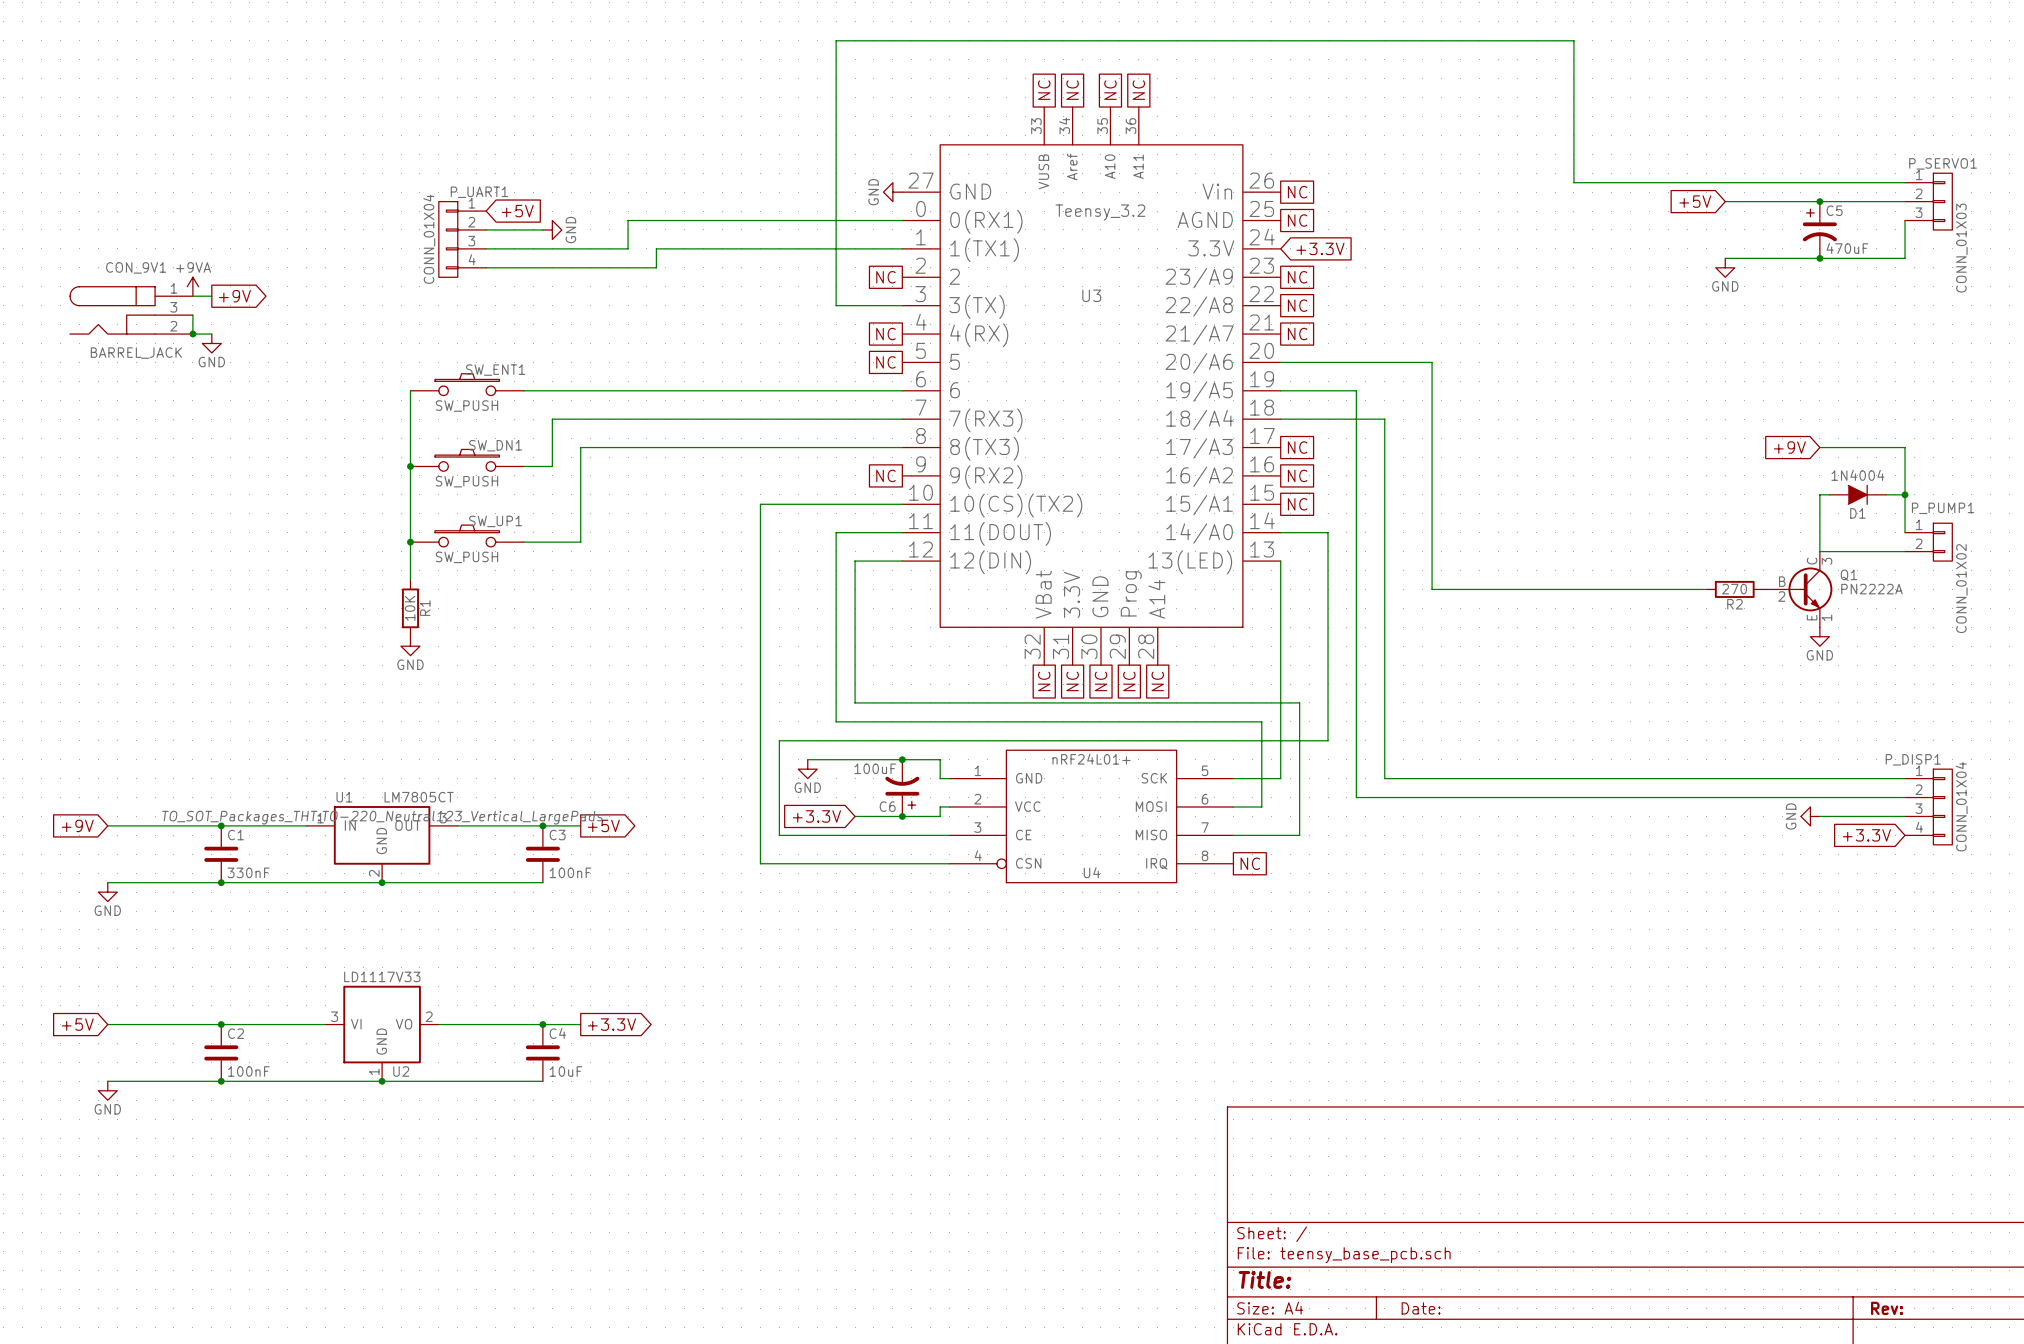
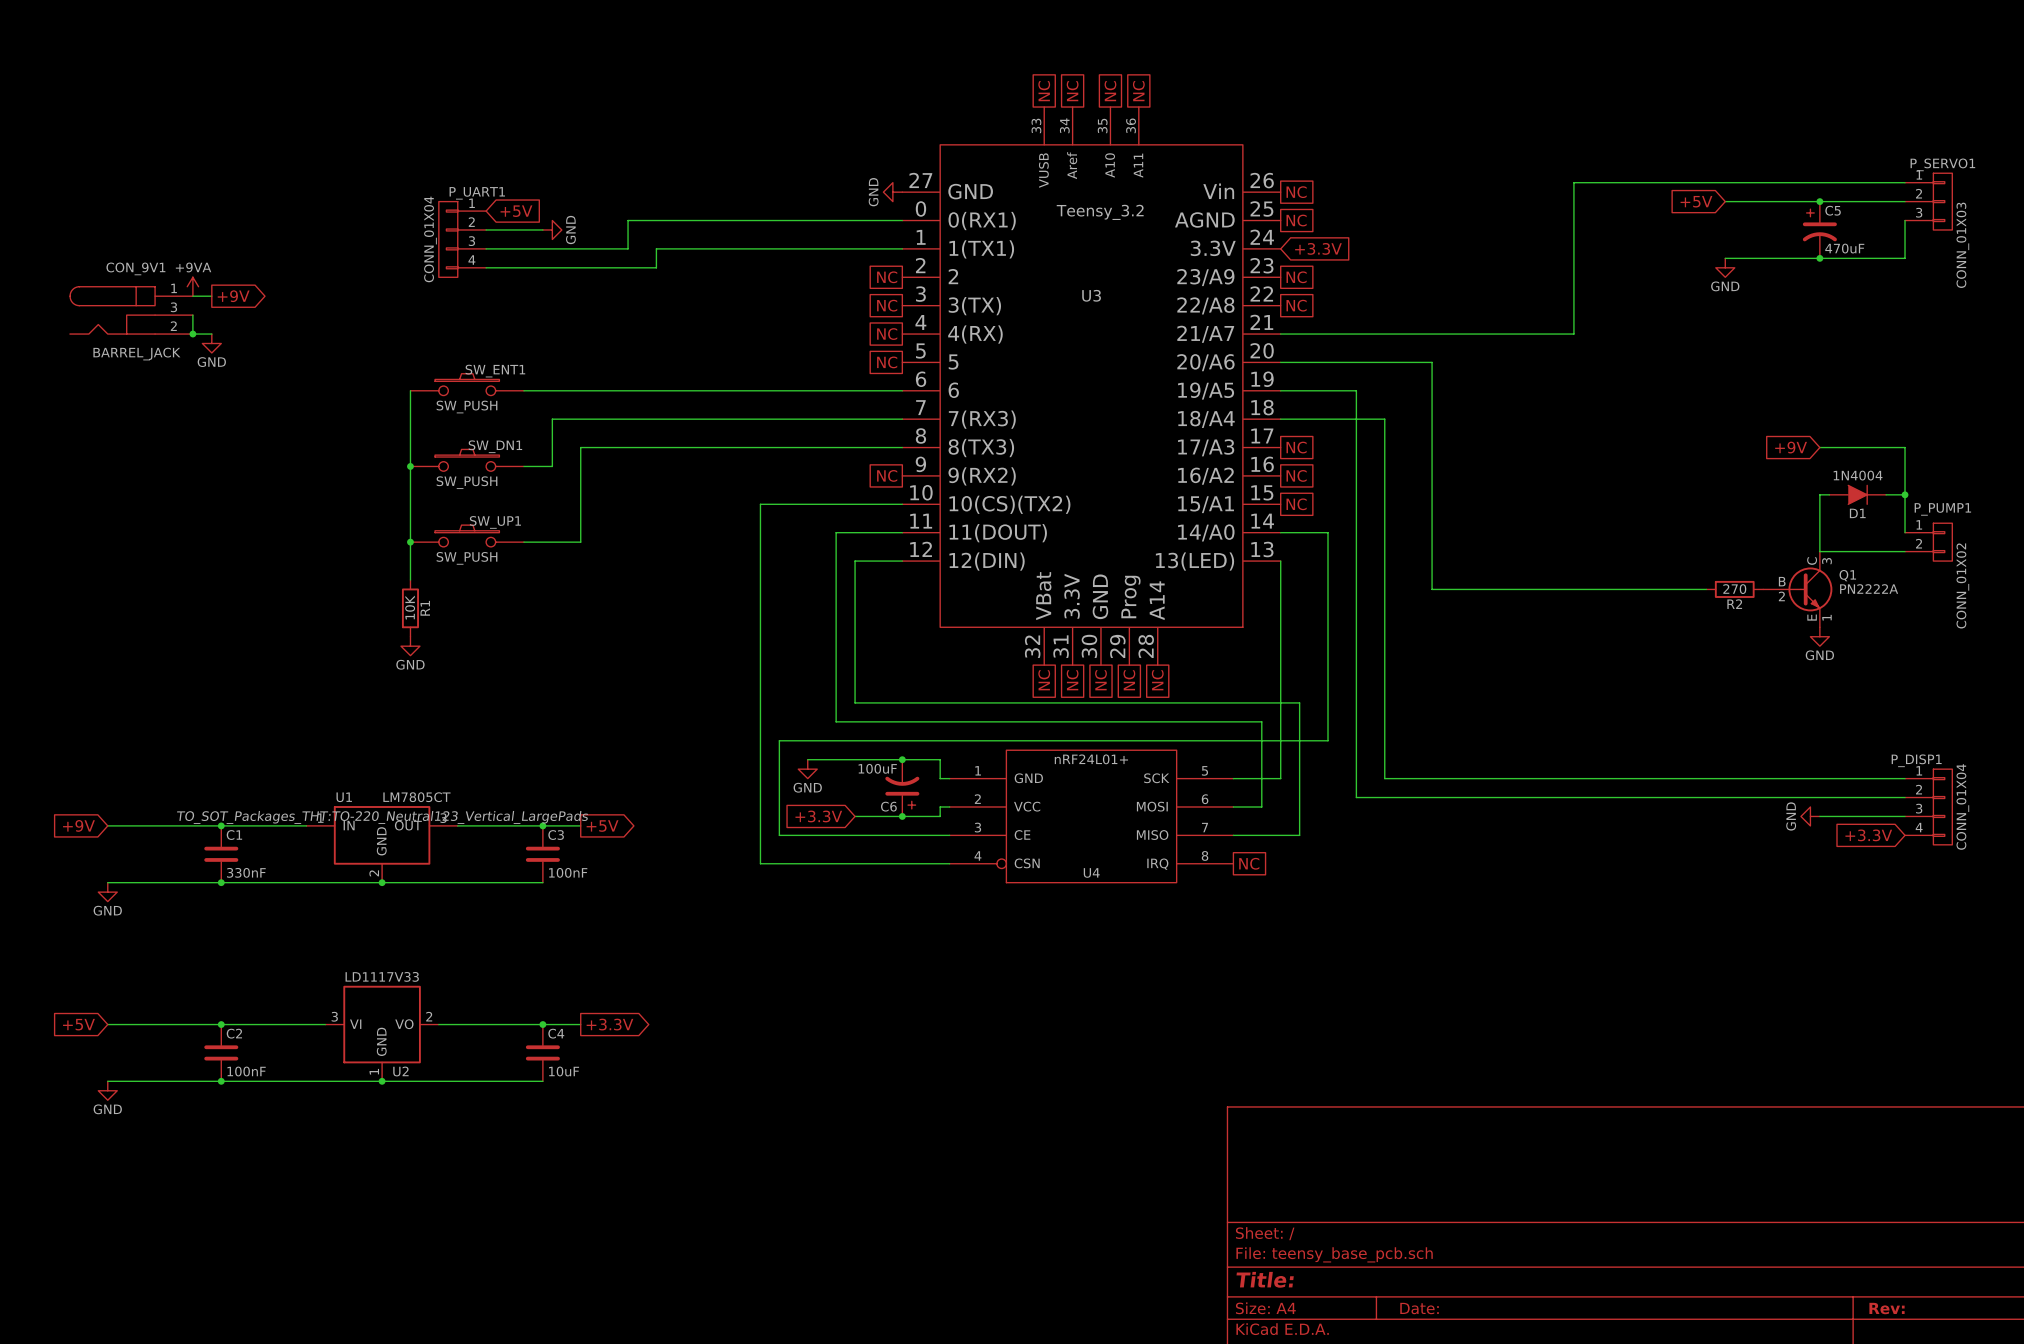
wire: (1573, 182) (1573, 40) (836, 40) (836, 305) (902, 305) -> (1573, 182) (1573, 334) (1280, 334)
global label: none -> NC (887, 305)
global label: NC (1297, 334) -> none

